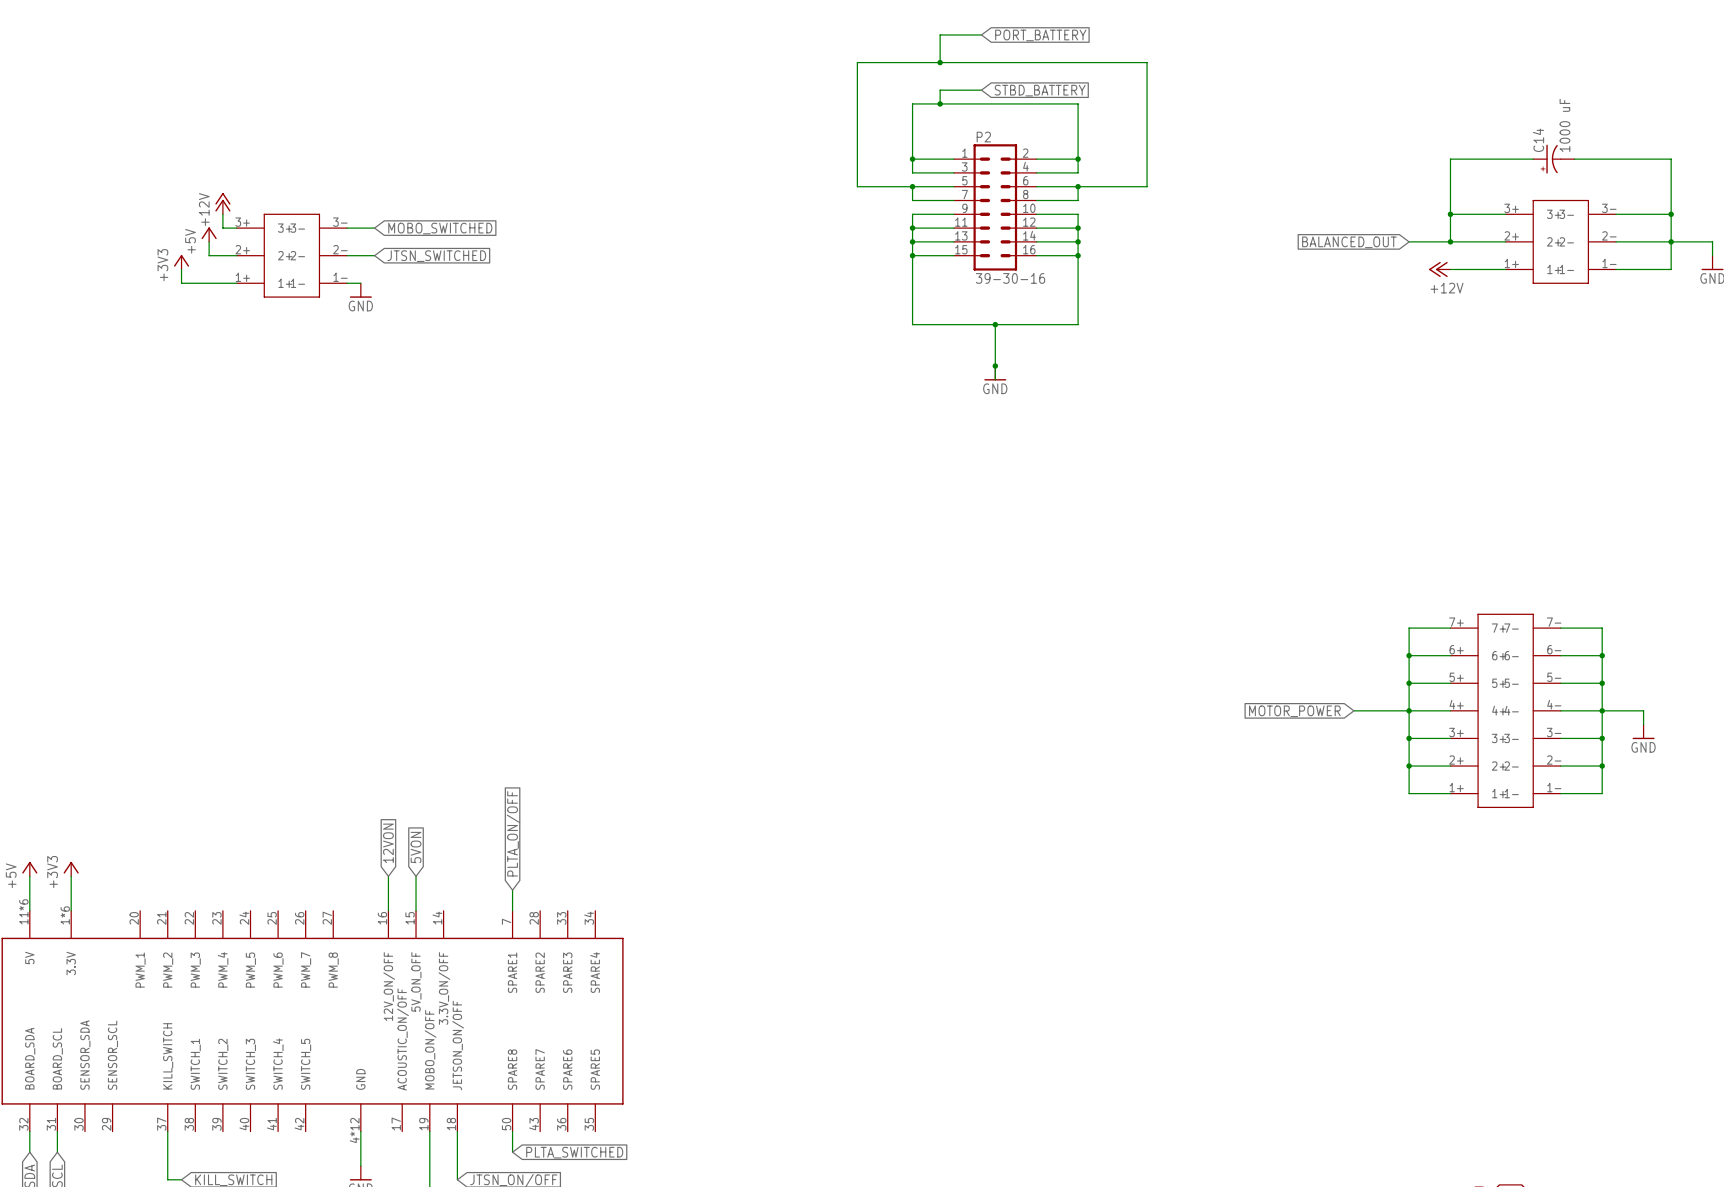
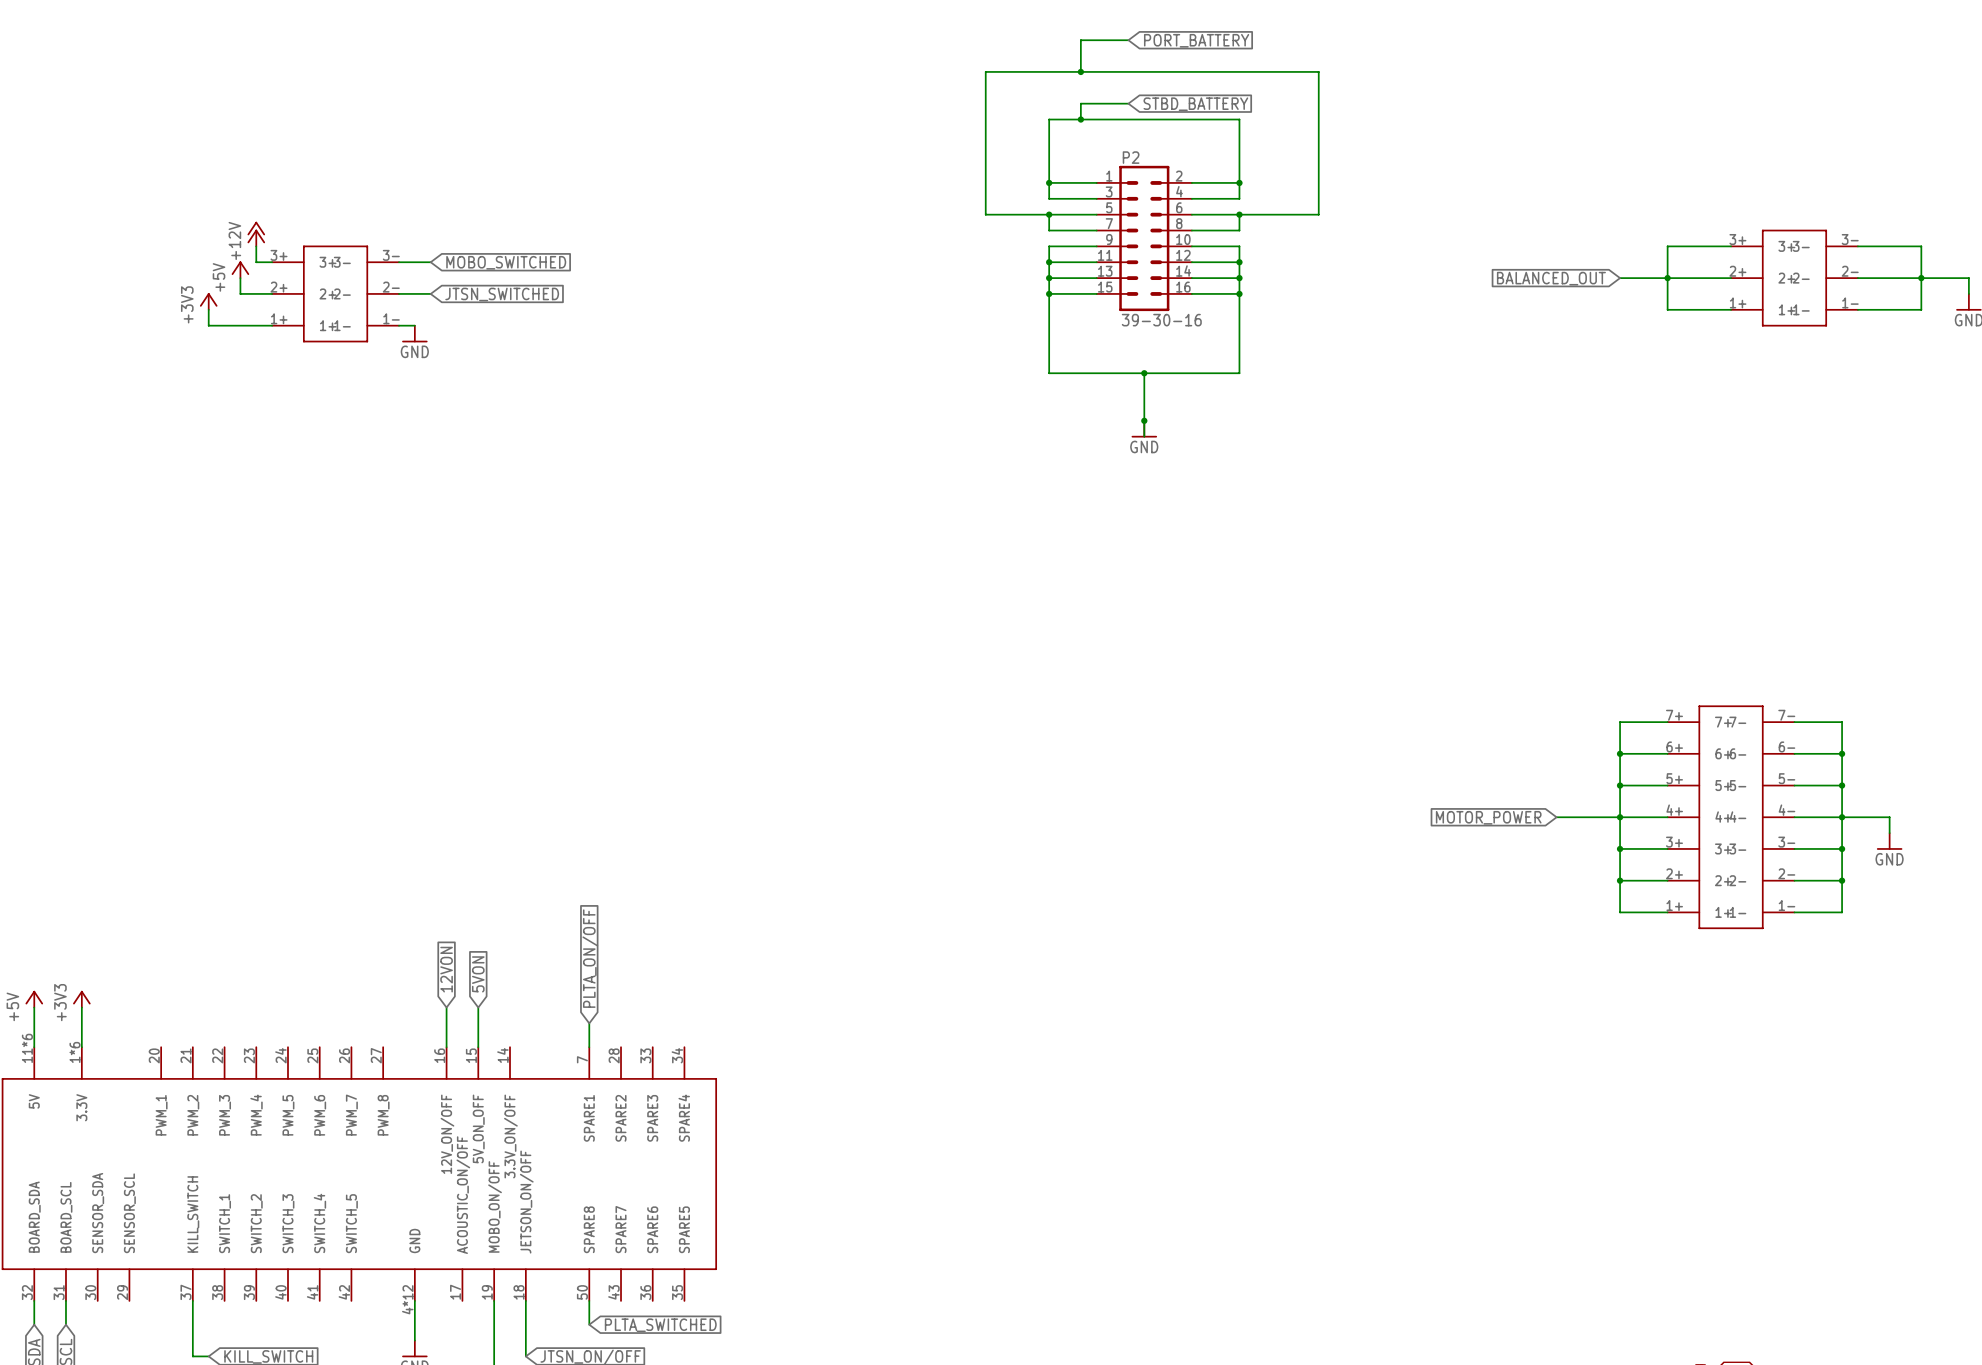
wire: (1533, 159) (1450, 159) (1450, 214) -> none
C14: 1000 uF (1553, 159) -> none
wire: (1574, 159) (1671, 159) (1671, 214) -> none
junction: (1450, 214) -> none
junction: (1671, 214) -> none
wire: none -> (1667, 278) (1667, 309)
power symbol: +12V (1439, 269) -> none

